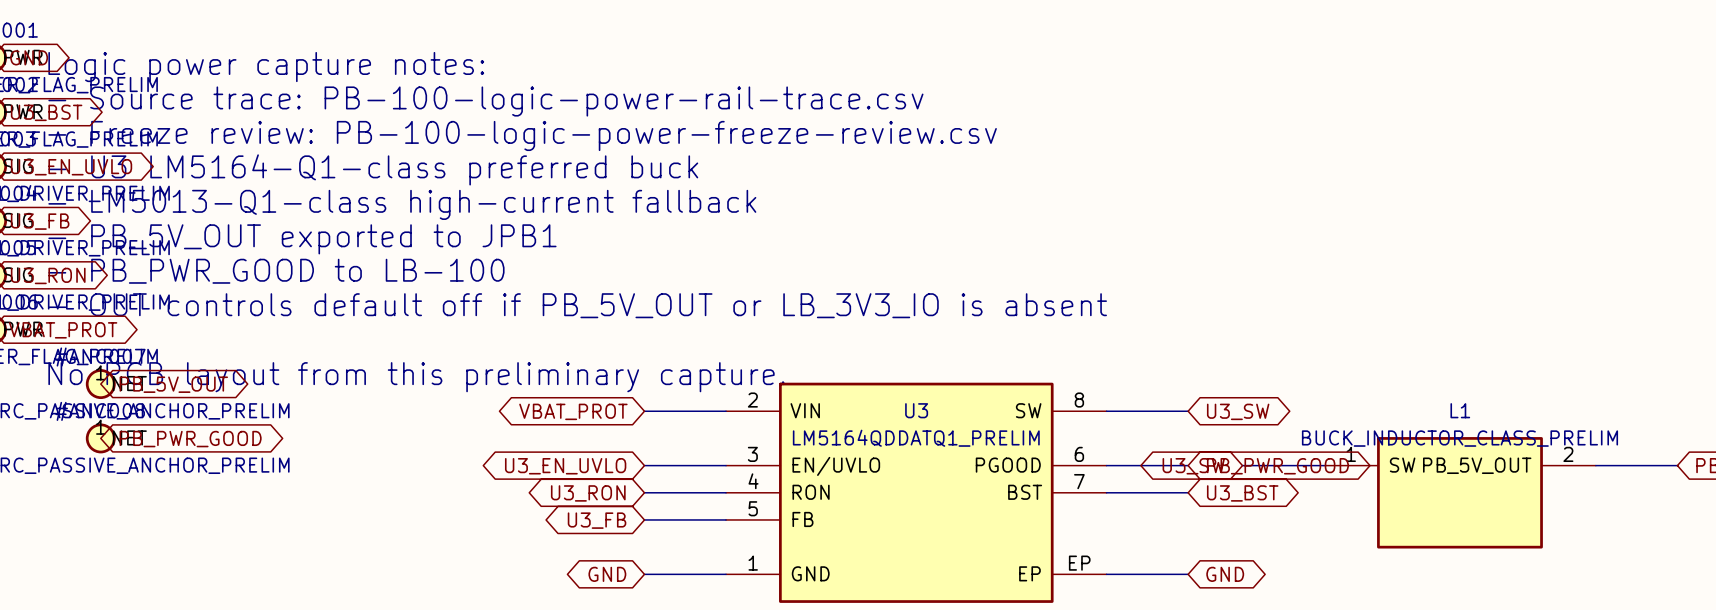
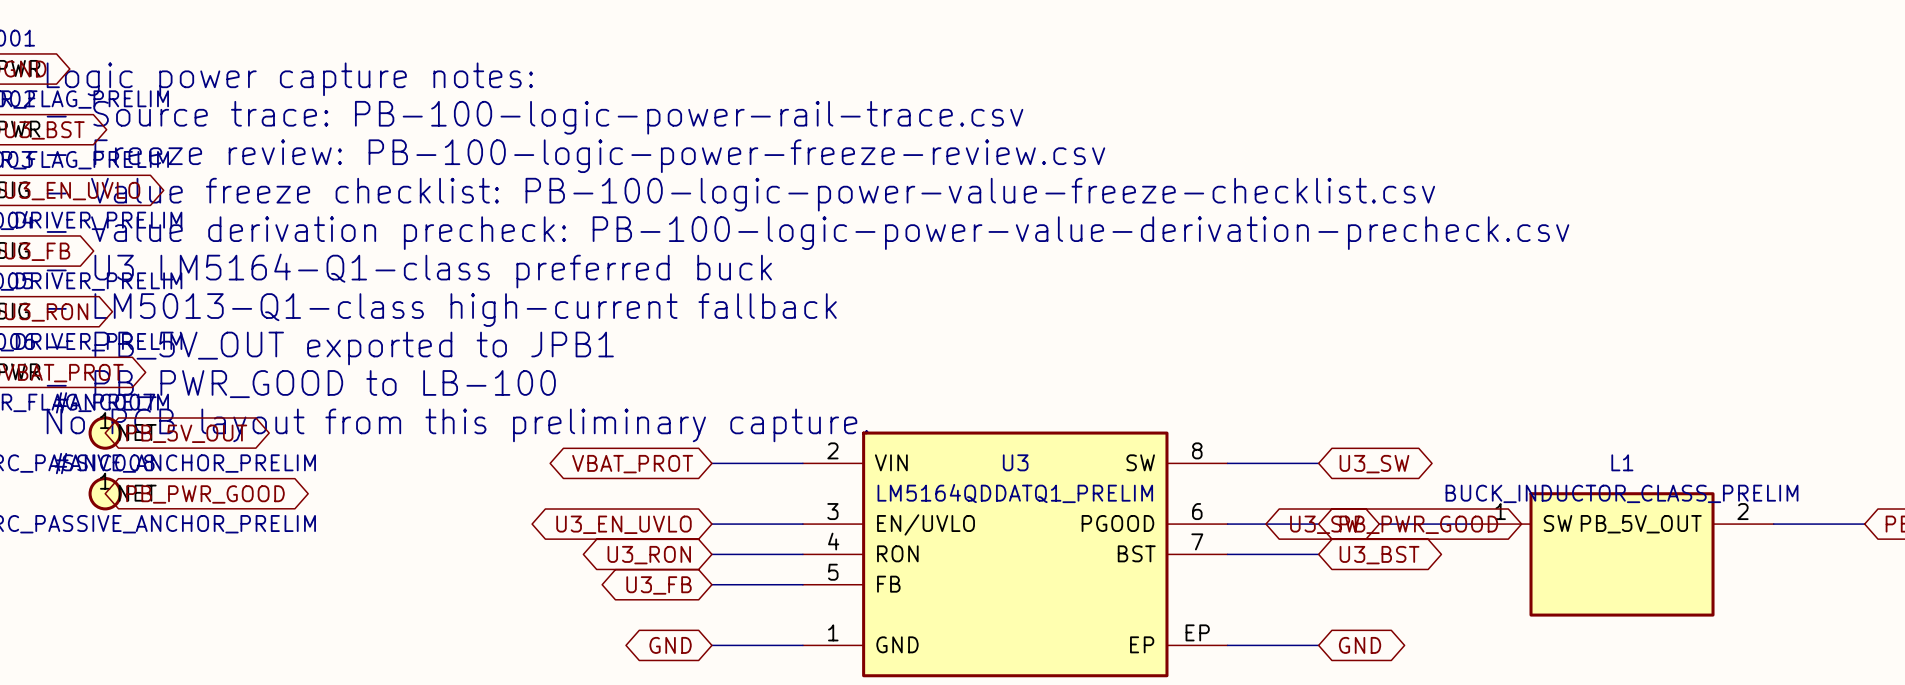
text: - U3 LM5164-Q1-class preferred buck (373, 169) -> - Value freeze checklist: PB-100-logic-power-value-freeze-checklist.csv (740, 194)
text: - LM5013-Q1-class high-current fallback (402, 204) -> - Value derivation precheck: PB-100-logic-power-value-derivation-precheck.csv (808, 233)
text: - PB_5V_OUT exported to JPB1 (302, 239) -> - U3 LM5164-Q1-class preferred buck (409, 271)
text: - PB_PWR_GOOD to LB-100 (276, 271) -> - LM5013-Q1-class high-current fallback (441, 310)
text: - OUT controls default off if PB_5V_OUT or LB_3V3_IO is absent (577, 305) -> - PB_5V_OUT exported to JPB1 (330, 348)
text: none -> - PB_PWR_GOOD to LB-100 (301, 384)

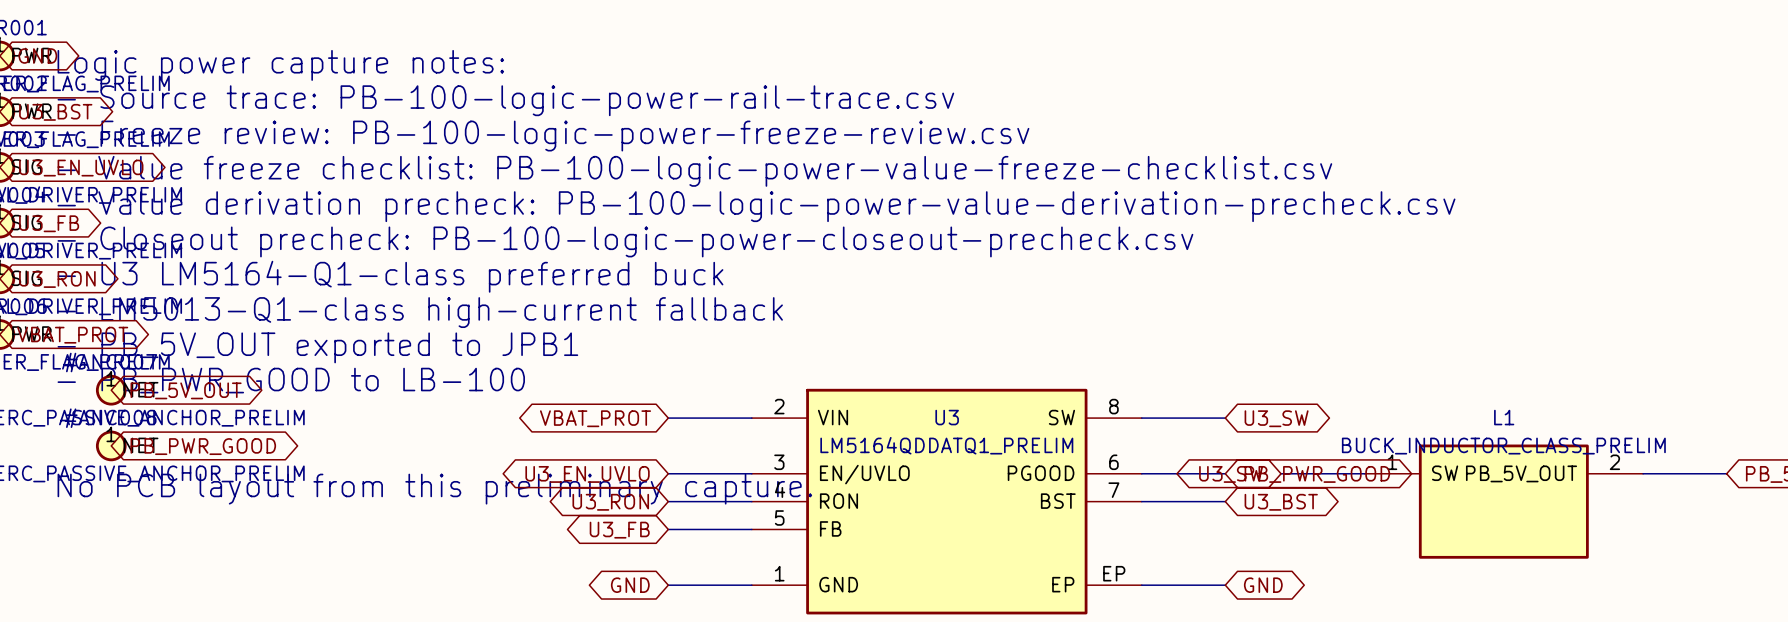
text: - U3 LM5164-Q1-class preferred buck (409, 271) -> - Closeout precheck: PB-100-logic-power-closeout-precheck.csv (625, 241)
text: - LM5013-Q1-class high-current fallback (441, 310) -> - U3 LM5164-Q1-class preferred buck (390, 276)
text: - PB_5V_OUT exported to JPB1 (330, 348) -> - LM5013-Q1-class high-current fallback (420, 312)
text: - PB_PWR_GOOD to LB-100 (301, 384) -> - PB_5V_OUT exported to JPB1 (317, 347)
text: No PCB layout from this preliminary capture. (457, 425) -> - PB_PWR_GOOD to LB-100 (291, 380)
text: none -> No PCB layout from this preliminary capture. (434, 489)

